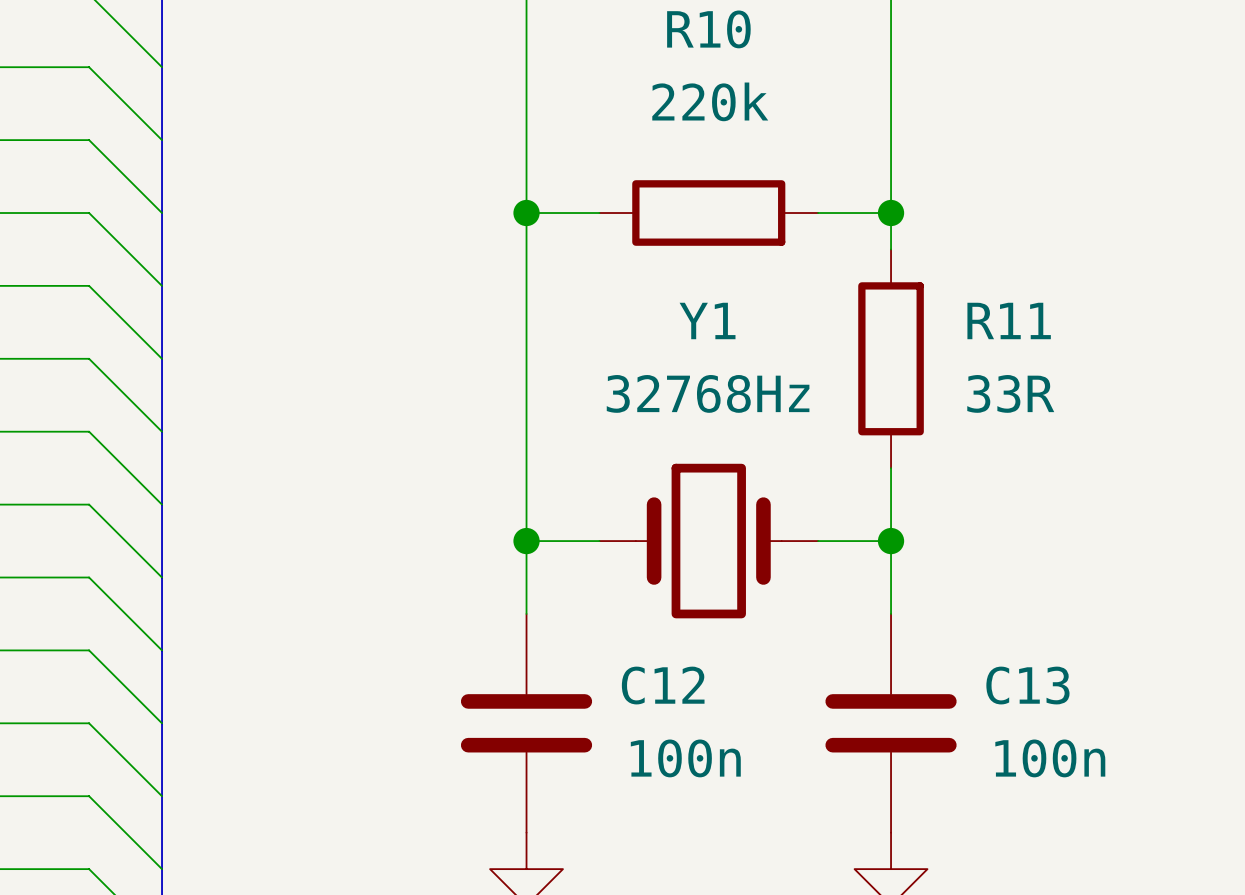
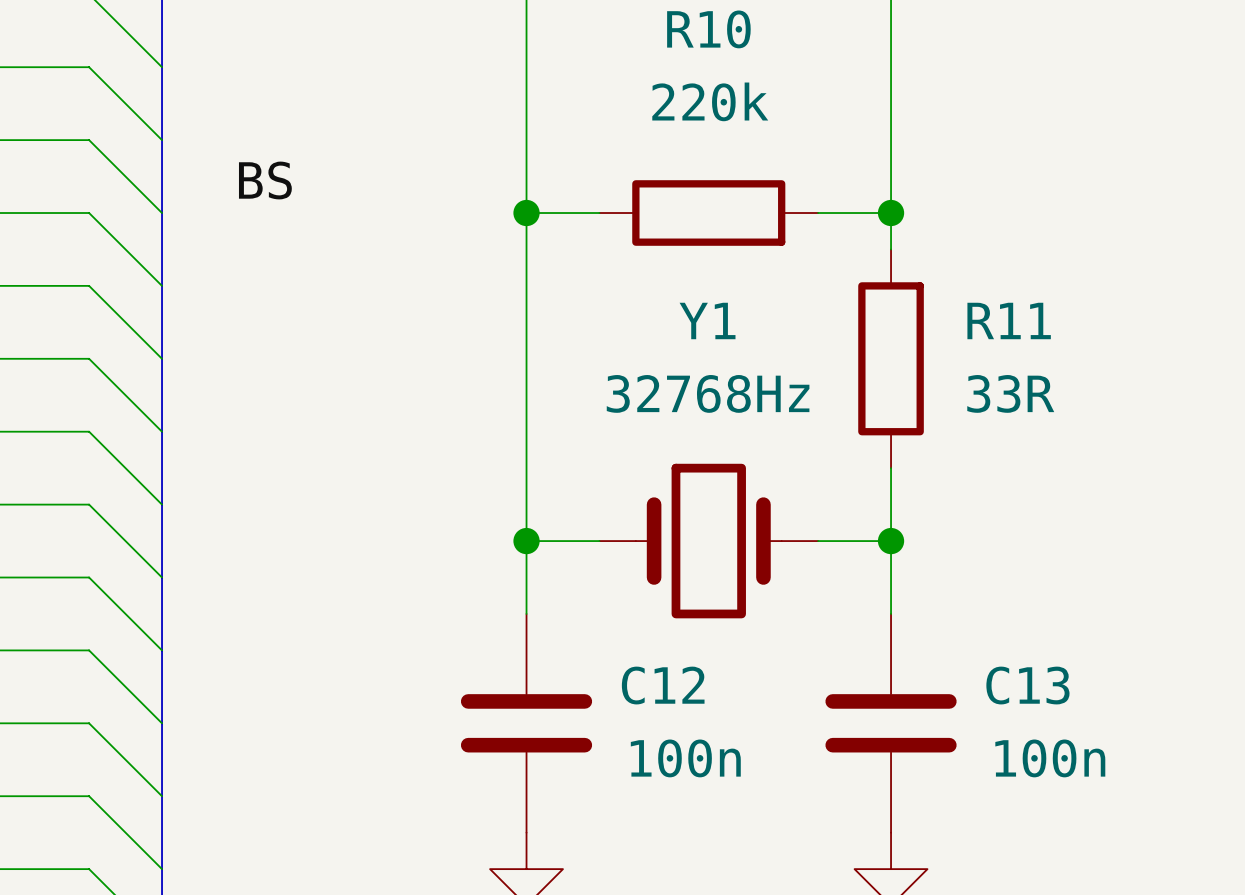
label: none -> BS (265, 180)

